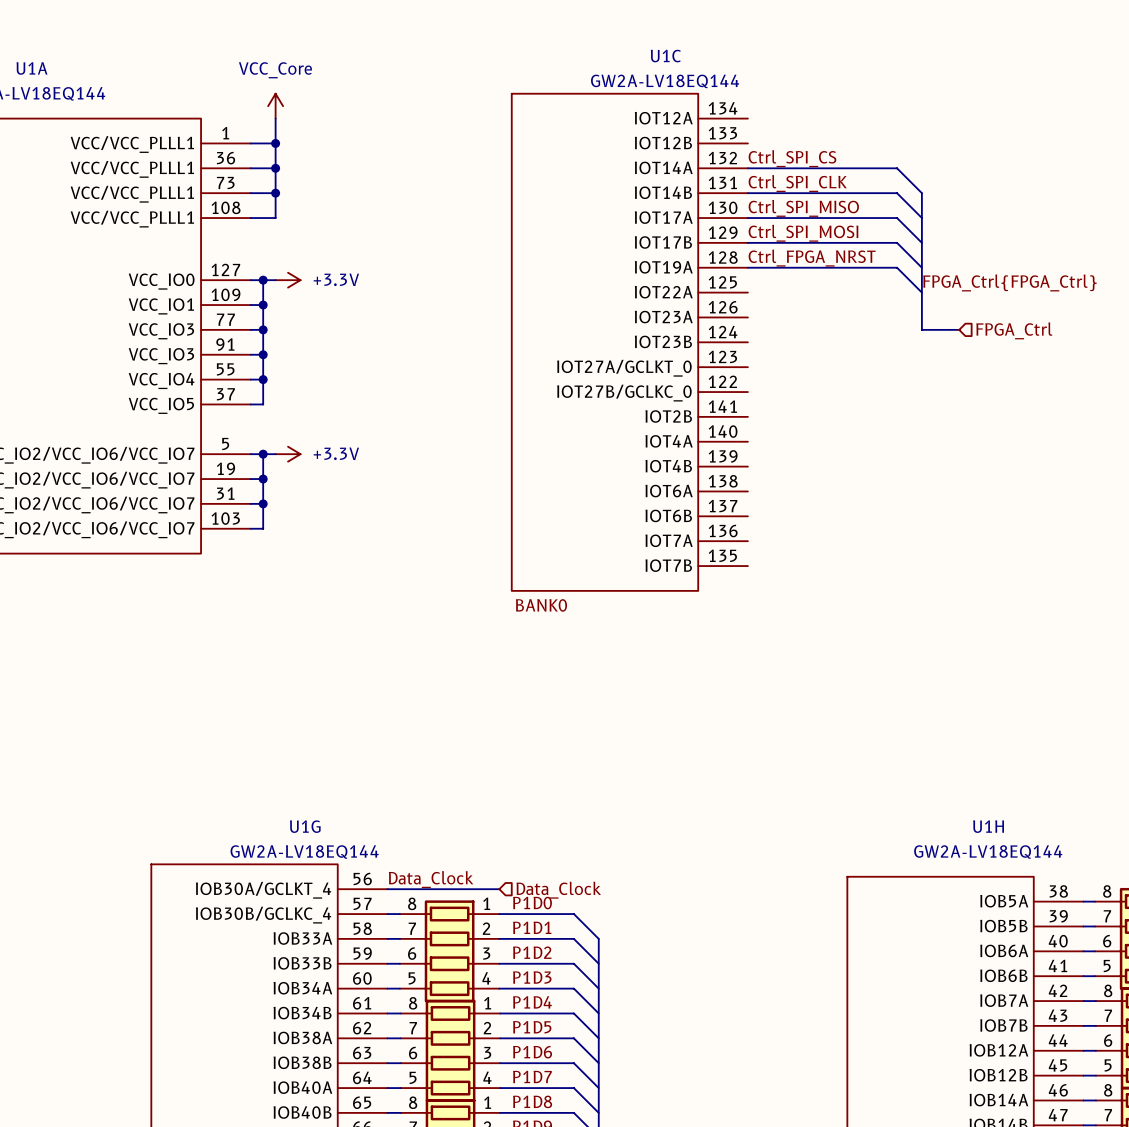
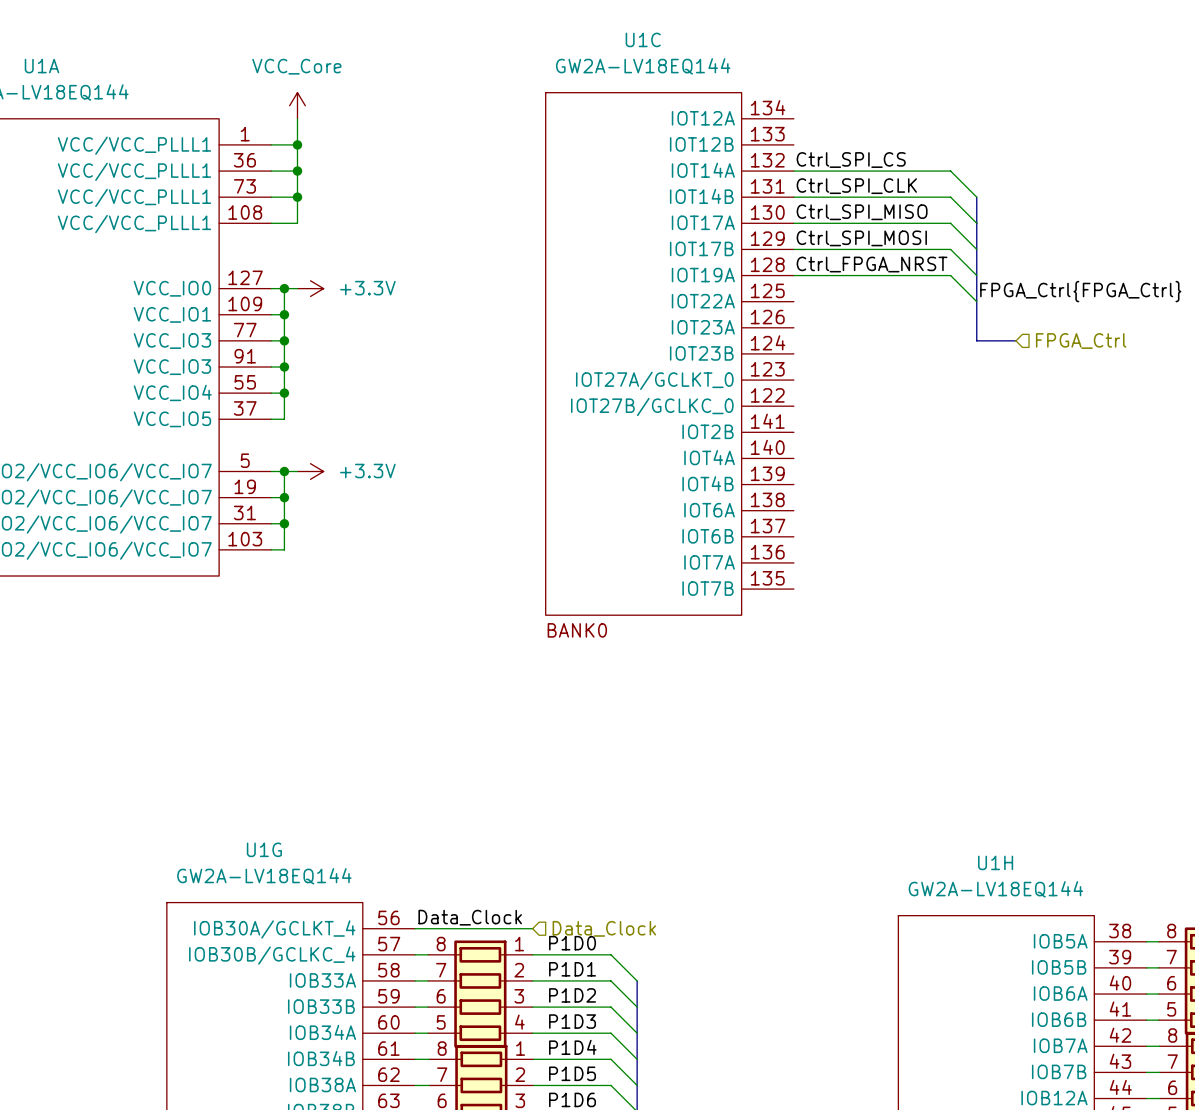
U1C name position: U1C (665, 56) -> U1C (643, 39)
U1C value position: GW2A-LV18EQ144 (665, 81) -> GW2A-LV18EQ144 (643, 66)
U1G name position: U1G (305, 826) -> U1G (264, 849)
U1H name position: U1H (988, 826) -> U1H (995, 862)
U1G value position: GW2A-LV18EQ144 (304, 852) -> GW2A-LV18EQ144 (264, 876)
U1H value position: GW2A-LV18EQ144 (988, 852) -> GW2A-LV18EQ144 (995, 889)

